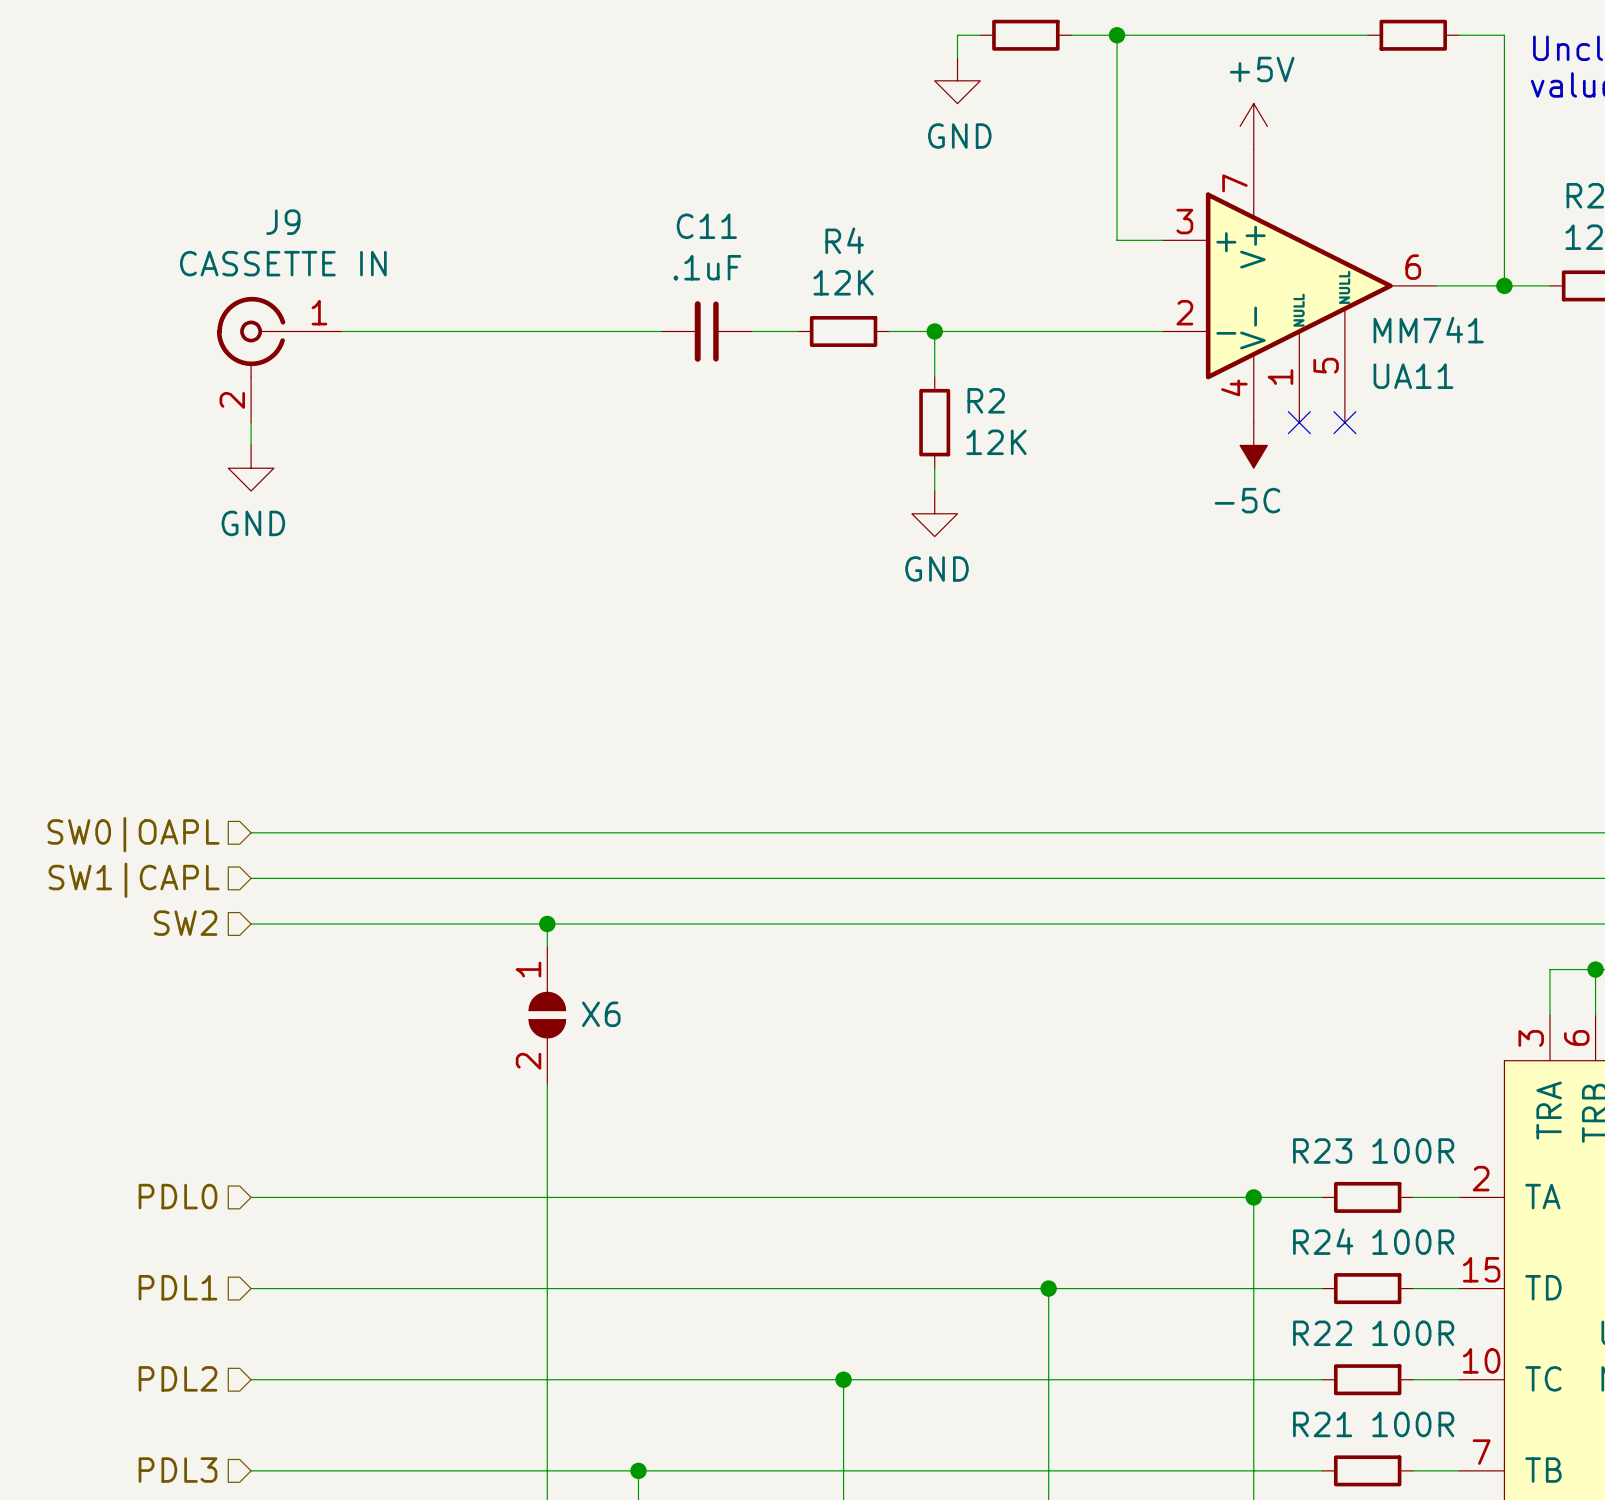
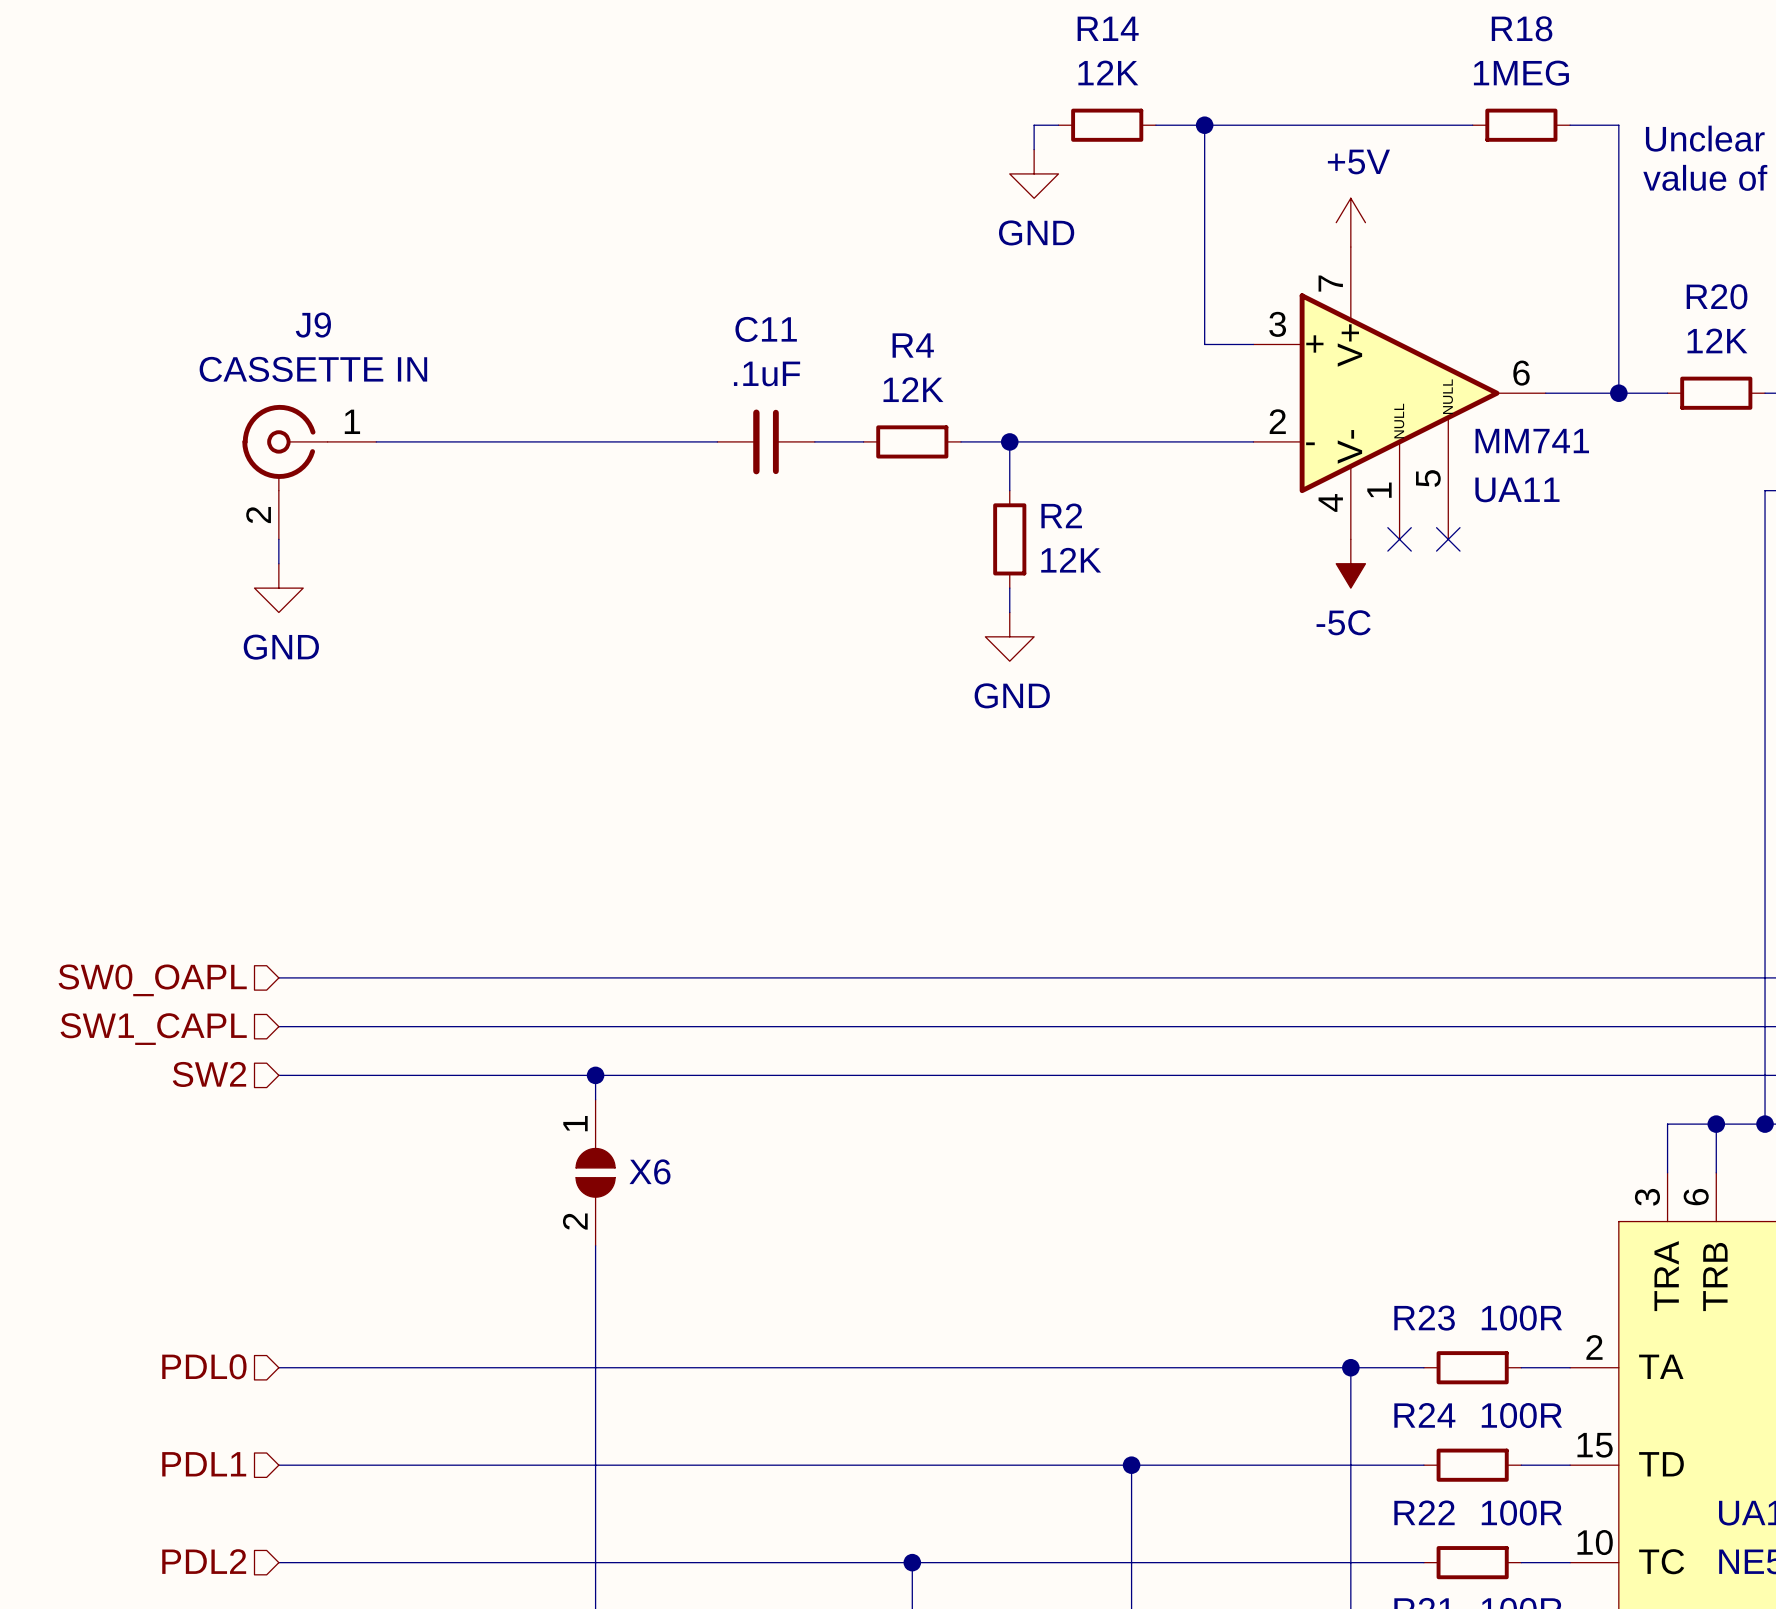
hierarchical label: SW0|OAPL (133, 834) -> SW0_OAPL (152, 980)
hierarchical label: SW1|CAPL (134, 880) -> SW1_CAPL (153, 1029)

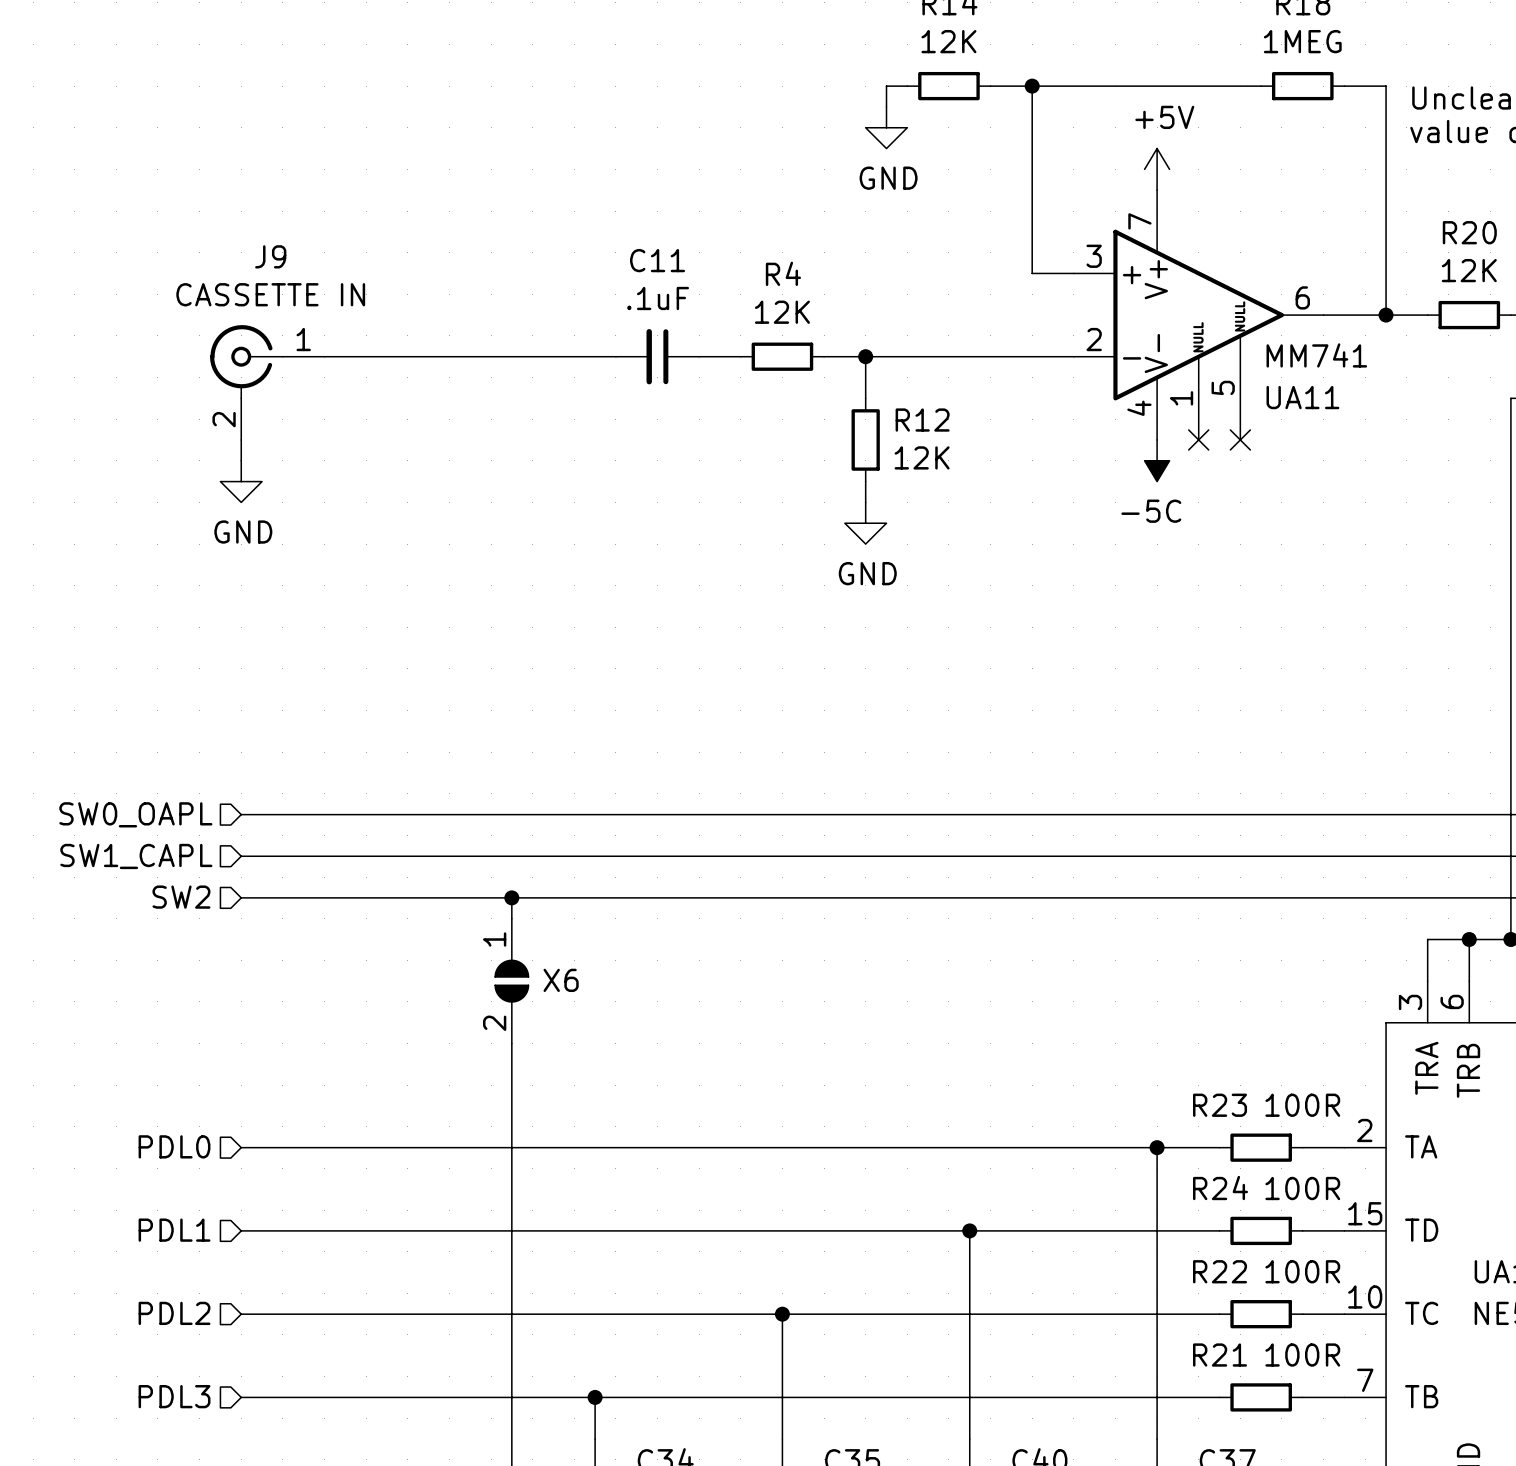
R2 name: R2 (1061, 515) -> R12 (922, 420)

